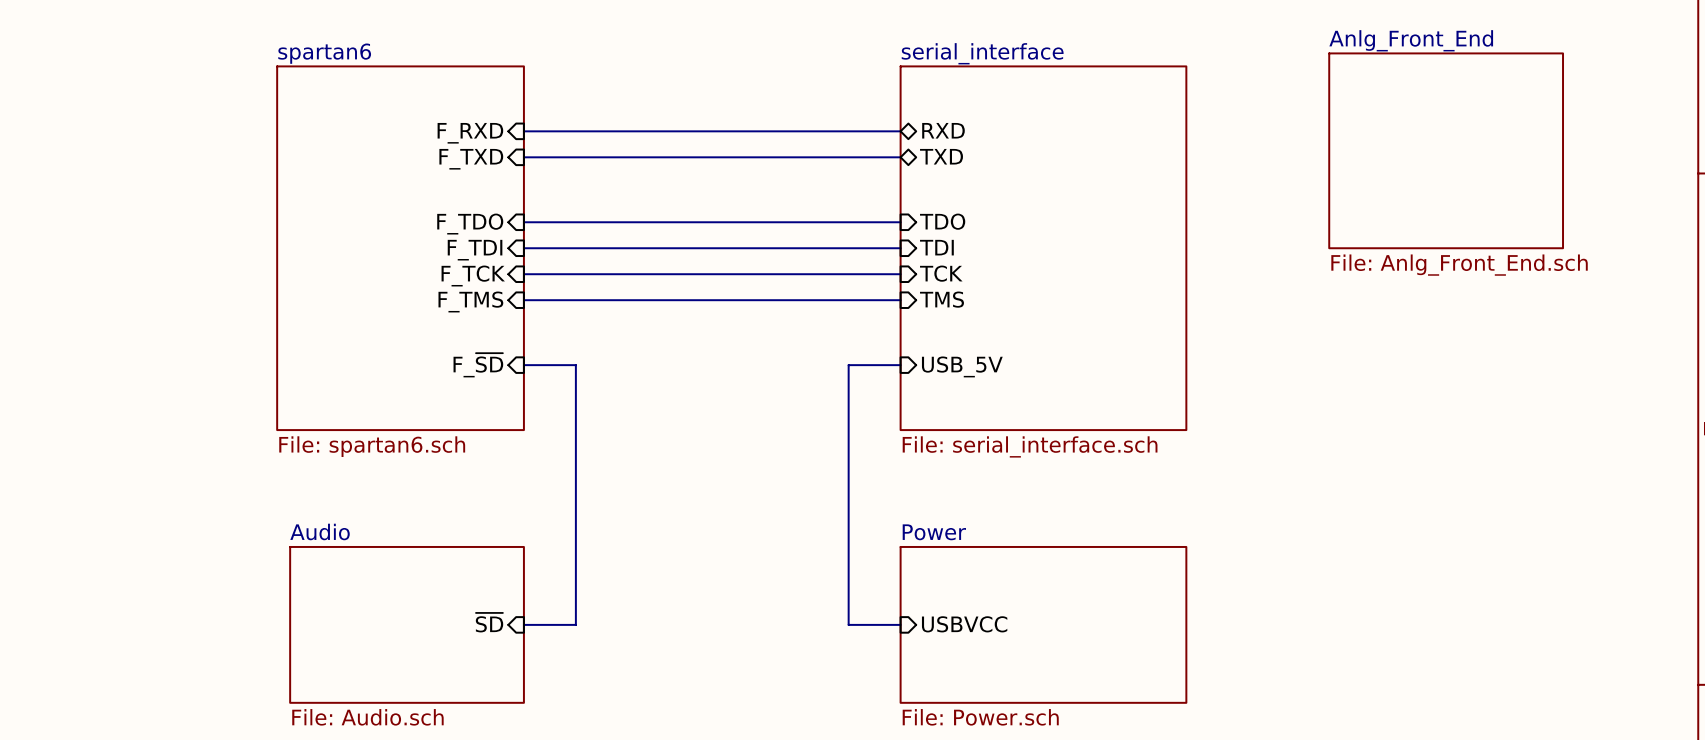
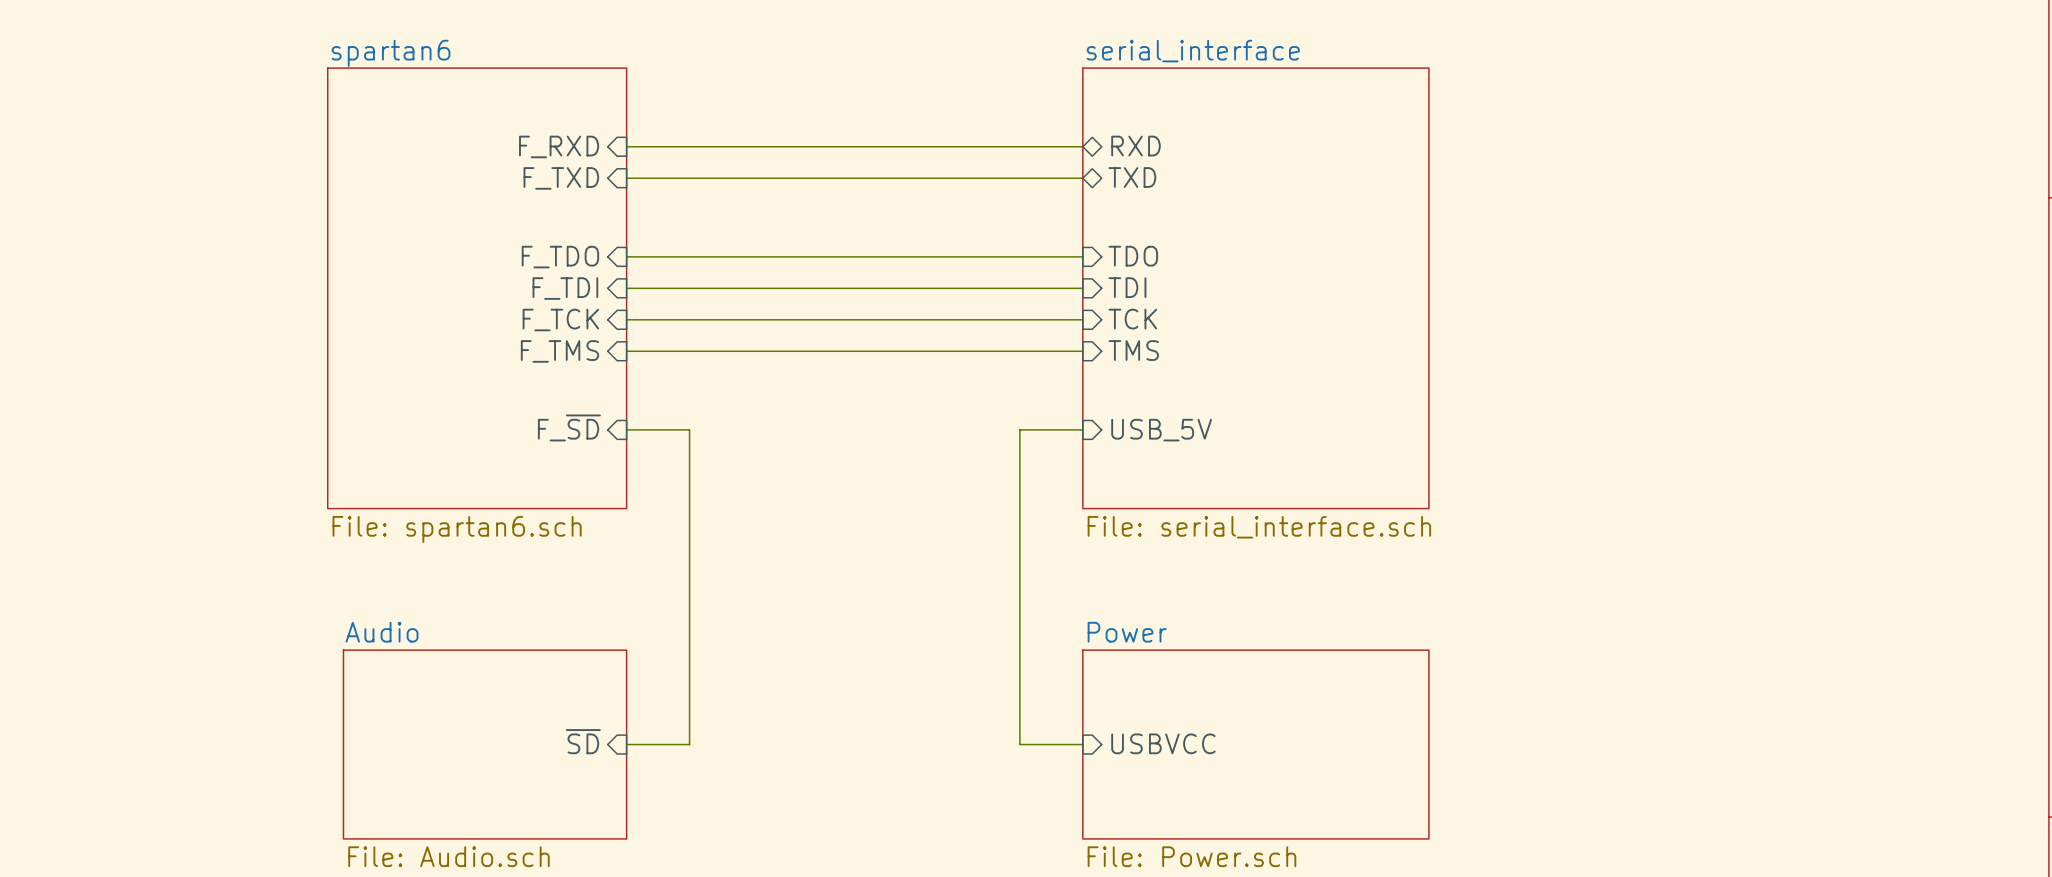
sheet Anlg_Front_End: File: Anlg_Front_End.sch (1446, 150) -> none

